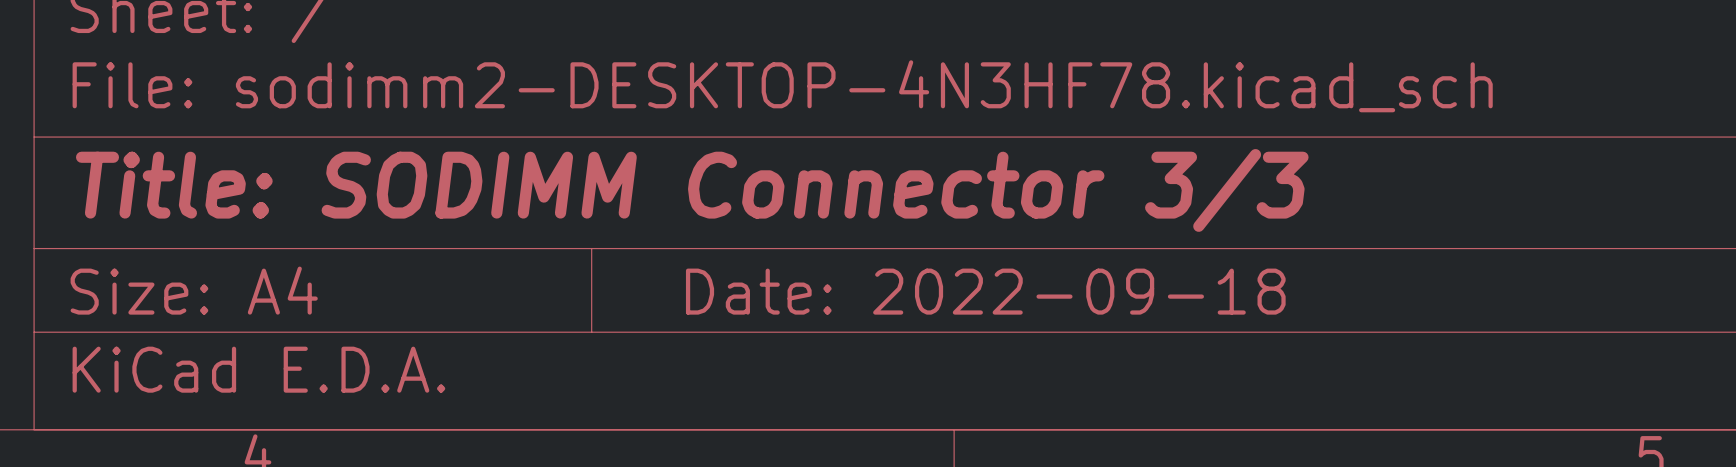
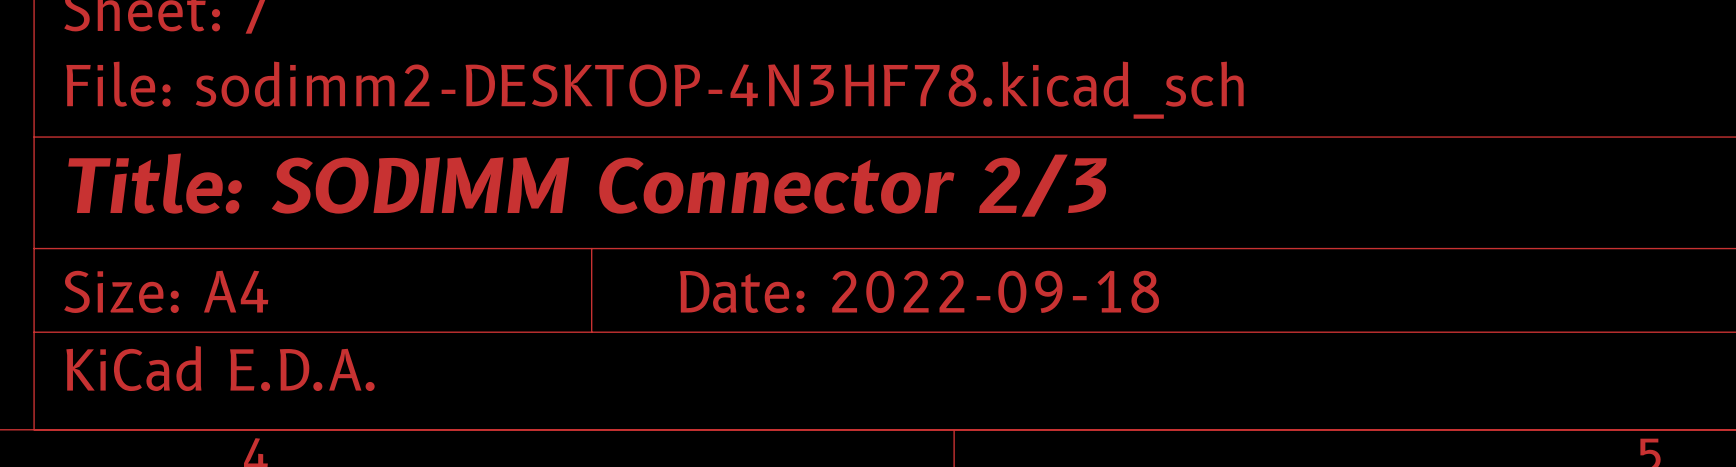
title block: Title: SODIMM Connector 3/3 (692, 190) -> Title: SODIMM Connector 2/3 (587, 185)

